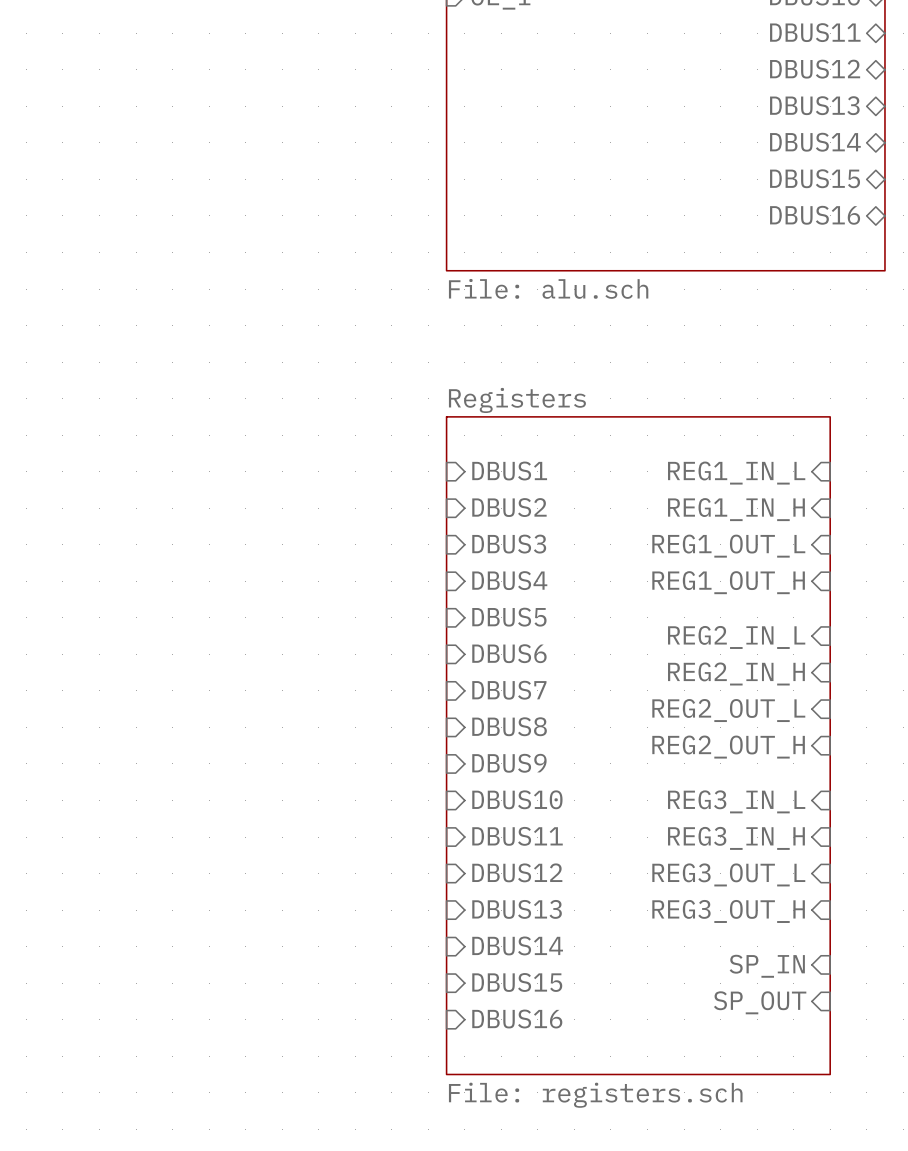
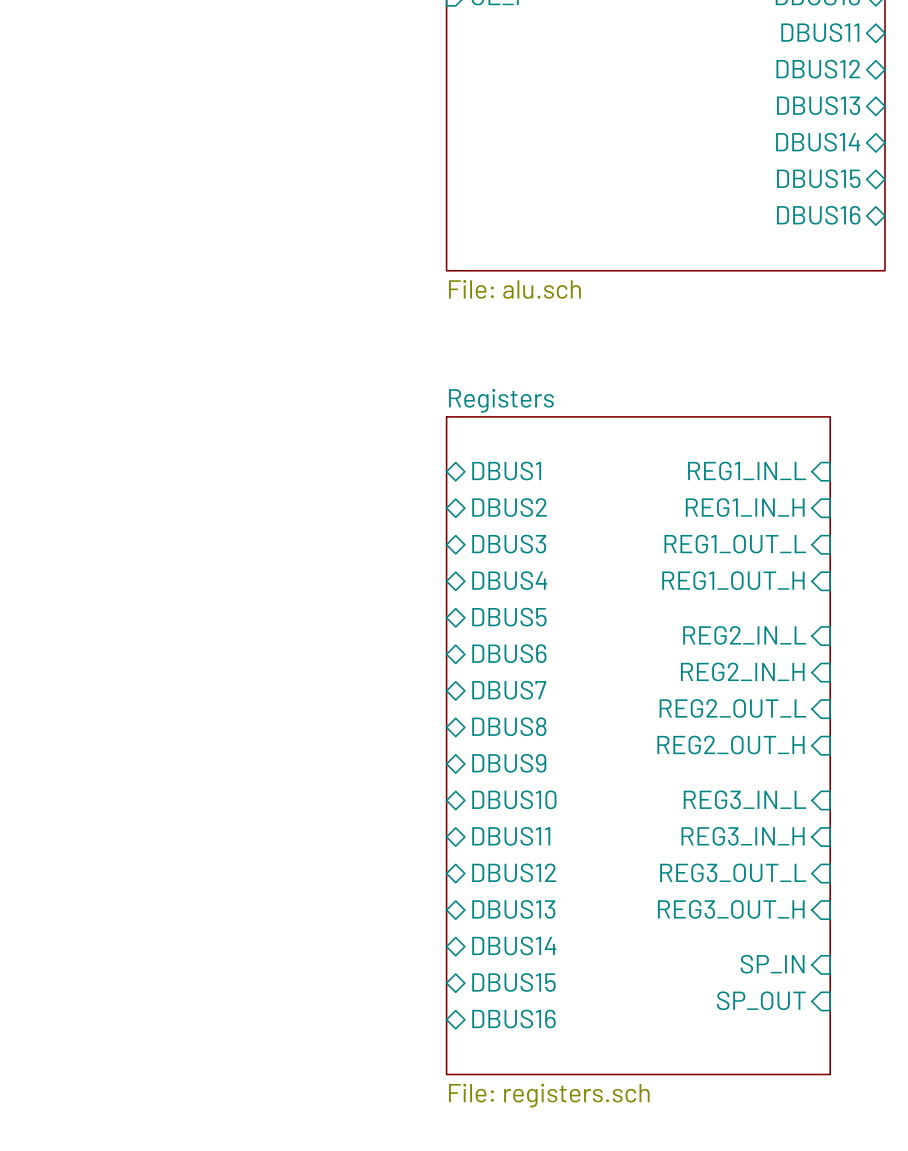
sheet pin shape: input (509, 471) -> bidirectional (506, 471)
sheet pin shape: input (509, 507) -> bidirectional (509, 507)
sheet pin shape: input (509, 544) -> bidirectional (509, 544)
sheet pin shape: input (509, 580) -> bidirectional (509, 580)
sheet pin shape: input (509, 617) -> bidirectional (509, 617)
sheet pin shape: input (509, 653) -> bidirectional (509, 653)
sheet pin shape: input (509, 690) -> bidirectional (509, 690)
sheet pin shape: input (509, 726) -> bidirectional (509, 726)
sheet pin shape: input (509, 763) -> bidirectional (509, 763)
sheet pin shape: input (517, 799) -> bidirectional (514, 799)
sheet pin shape: input (517, 836) -> bidirectional (511, 836)
sheet pin shape: input (517, 872) -> bidirectional (514, 872)
sheet pin shape: input (517, 909) -> bidirectional (513, 909)
sheet pin shape: input (517, 945) -> bidirectional (514, 945)
sheet pin shape: input (517, 982) -> bidirectional (513, 982)
sheet pin shape: input (517, 1019) -> bidirectional (513, 1019)

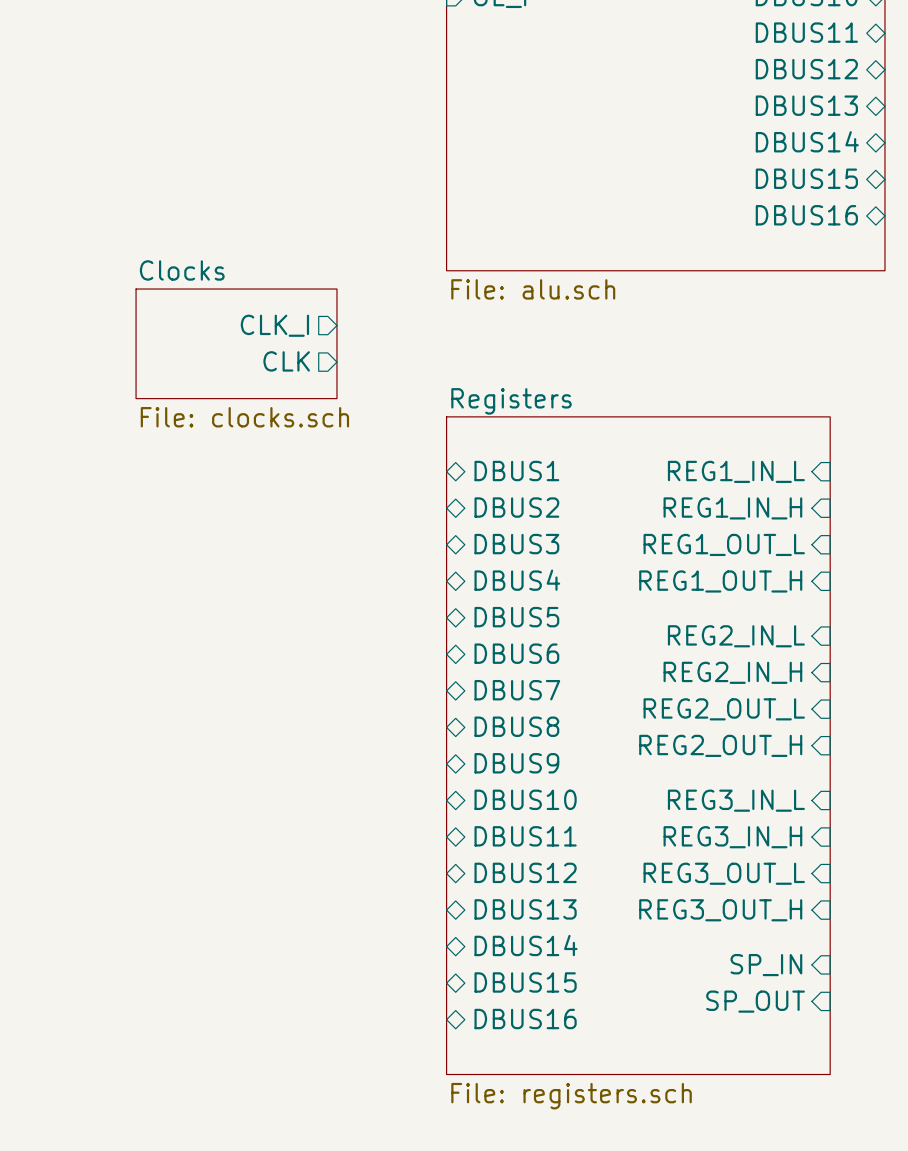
sheet pin: none -> CLK_I (274, 325)
sheet Clocks: none -> File: clocks.sch (236, 343)
sheet pin: none -> CLK (286, 361)

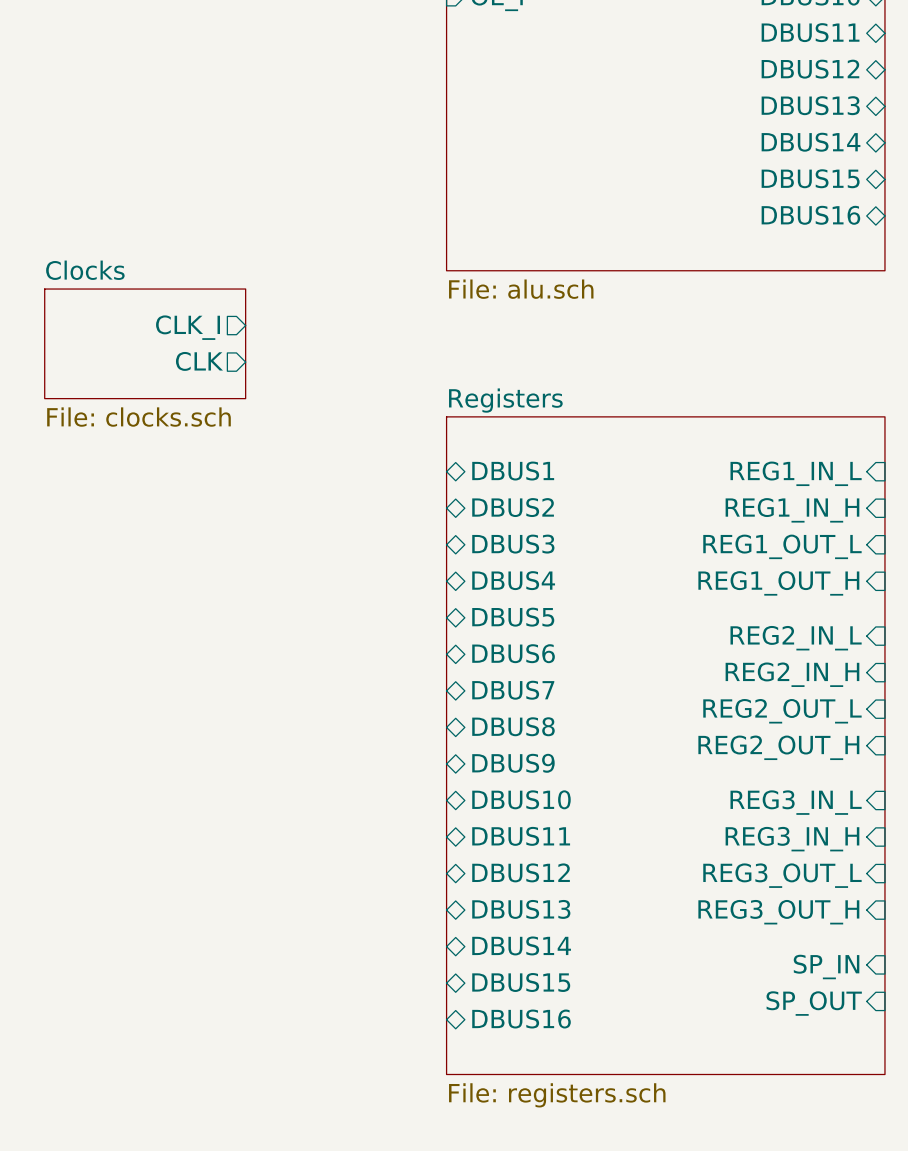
sheet pin position: CLK_I (274, 325) -> CLK_I (188, 327)
sheet Clocks position: (236, 343) -> (145, 343)
sheet pin position: CLK (286, 361) -> CLK (199, 361)
sheet pin position: REG1_IN_L (736, 471) -> REG1_IN_L (796, 473)
sheet pin position: REG1_IN_H (732, 508) -> REG1_IN_H (792, 510)
sheet pin position: REG1_OUT_L (724, 544) -> REG1_OUT_L (782, 546)
sheet pin position: REG1_OUT_H (720, 581) -> REG1_OUT_H (778, 583)
sheet pin position: REG2_IN_L (736, 636) -> REG2_IN_L (796, 638)
sheet pin position: REG2_IN_H (732, 672) -> REG2_IN_H (792, 674)
sheet pin position: REG2_OUT_L (724, 709) -> REG2_OUT_L (782, 711)
sheet Registers: File: registers.sch (638, 745) -> none
sheet Registers: none -> File: registers.sch (665, 745)
sheet pin position: REG2_OUT_H (720, 745) -> REG2_OUT_H (778, 747)
sheet pin position: REG3_IN_L (736, 800) -> REG3_IN_L (796, 802)
sheet pin position: REG3_IN_H (732, 837) -> REG3_IN_H (792, 839)
sheet pin position: REG3_OUT_L (724, 873) -> REG3_OUT_L (782, 875)
sheet pin position: REG3_OUT_H (720, 910) -> REG3_OUT_H (778, 912)
sheet pin position: SP_IN (766, 965) -> SP_IN (826, 967)
sheet pin position: SP_OUT (755, 1001) -> SP_OUT (814, 1003)

